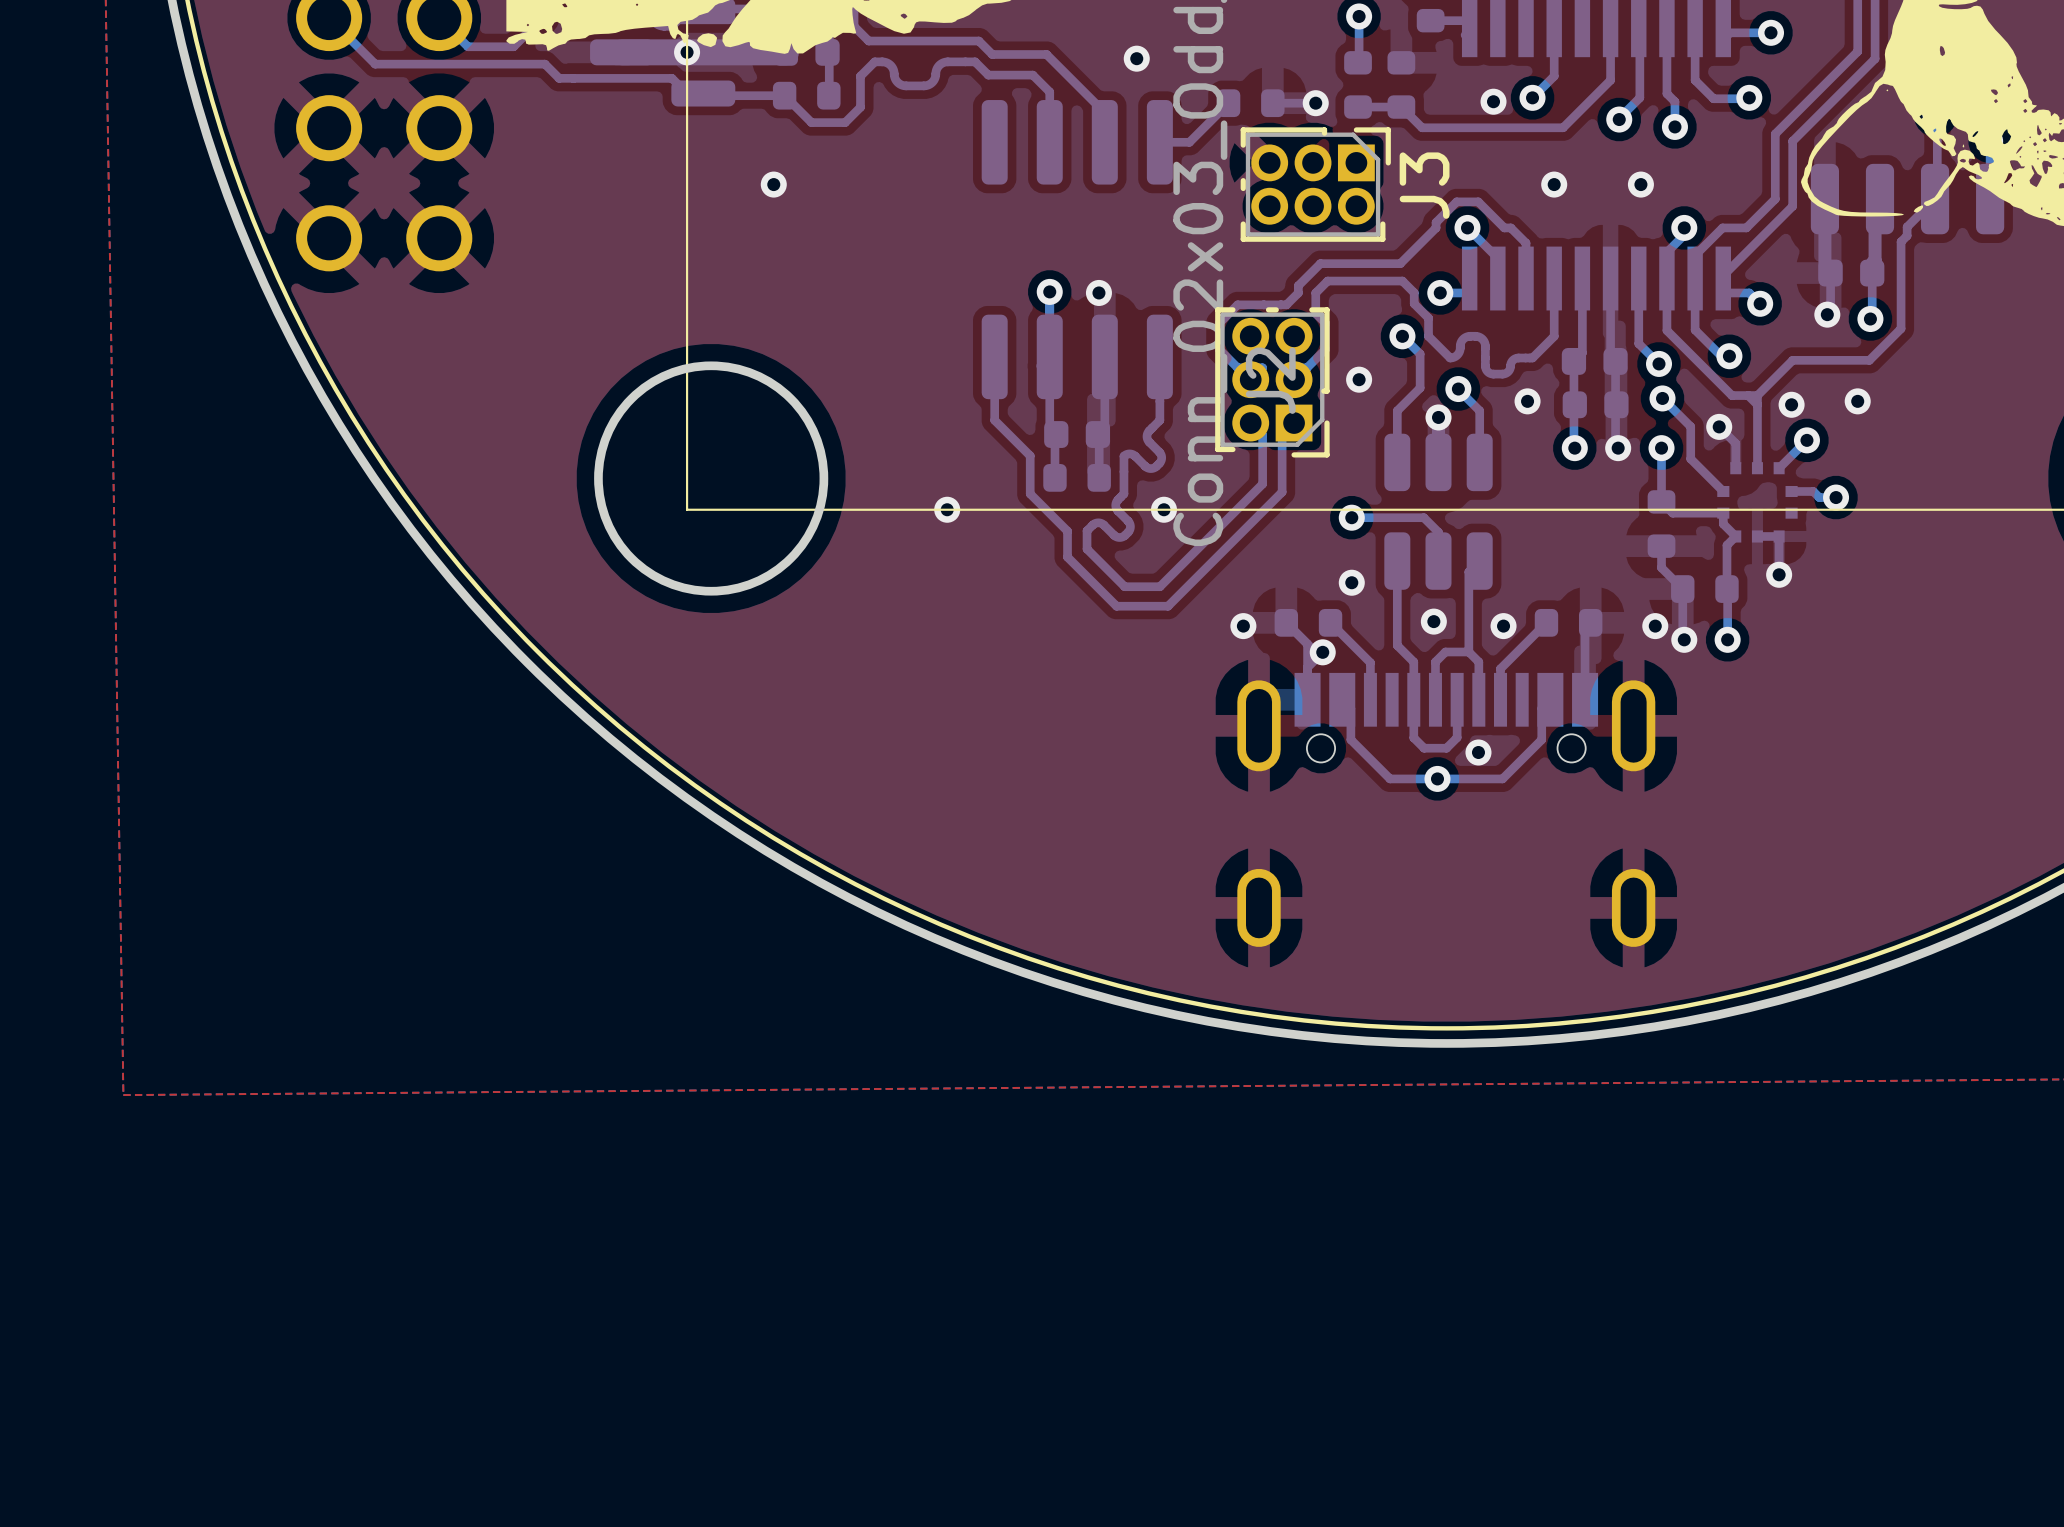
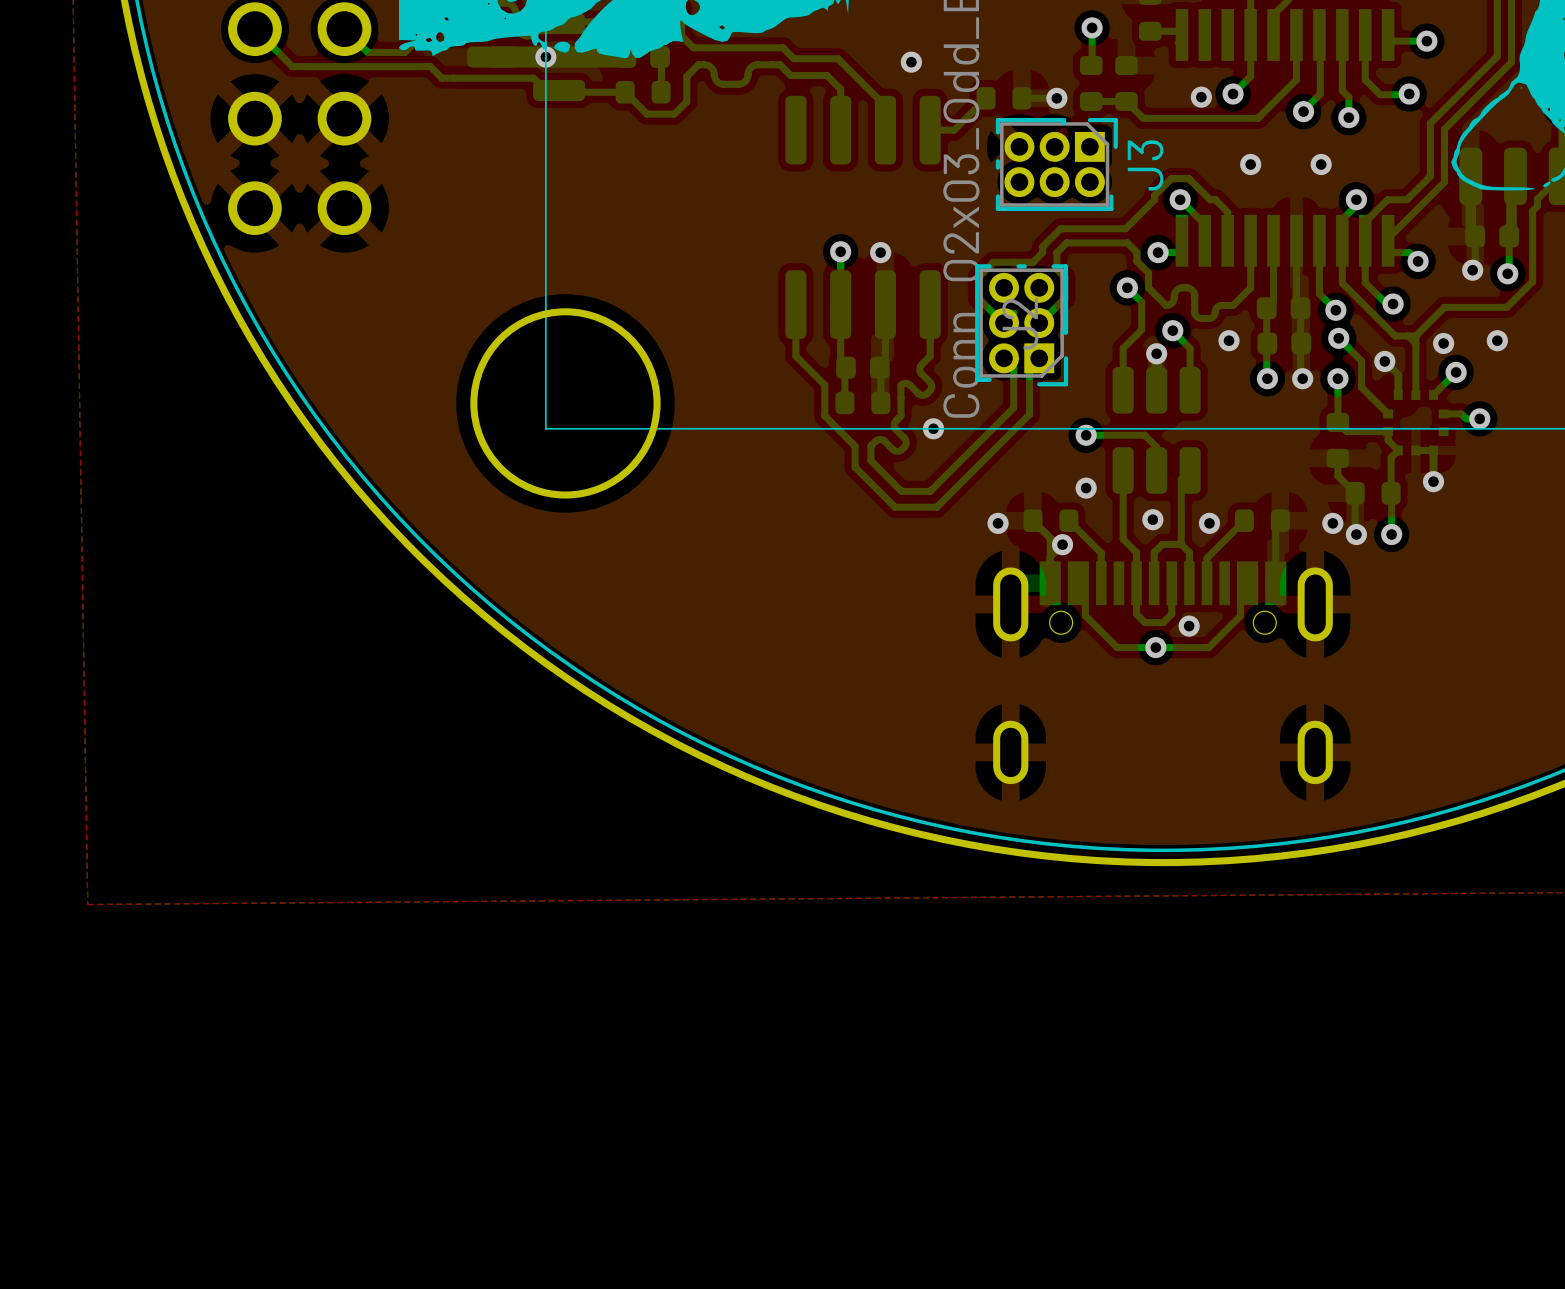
via: (773, 184) -> none
via: (1359, 379) -> none
via: (947, 509) -> none

